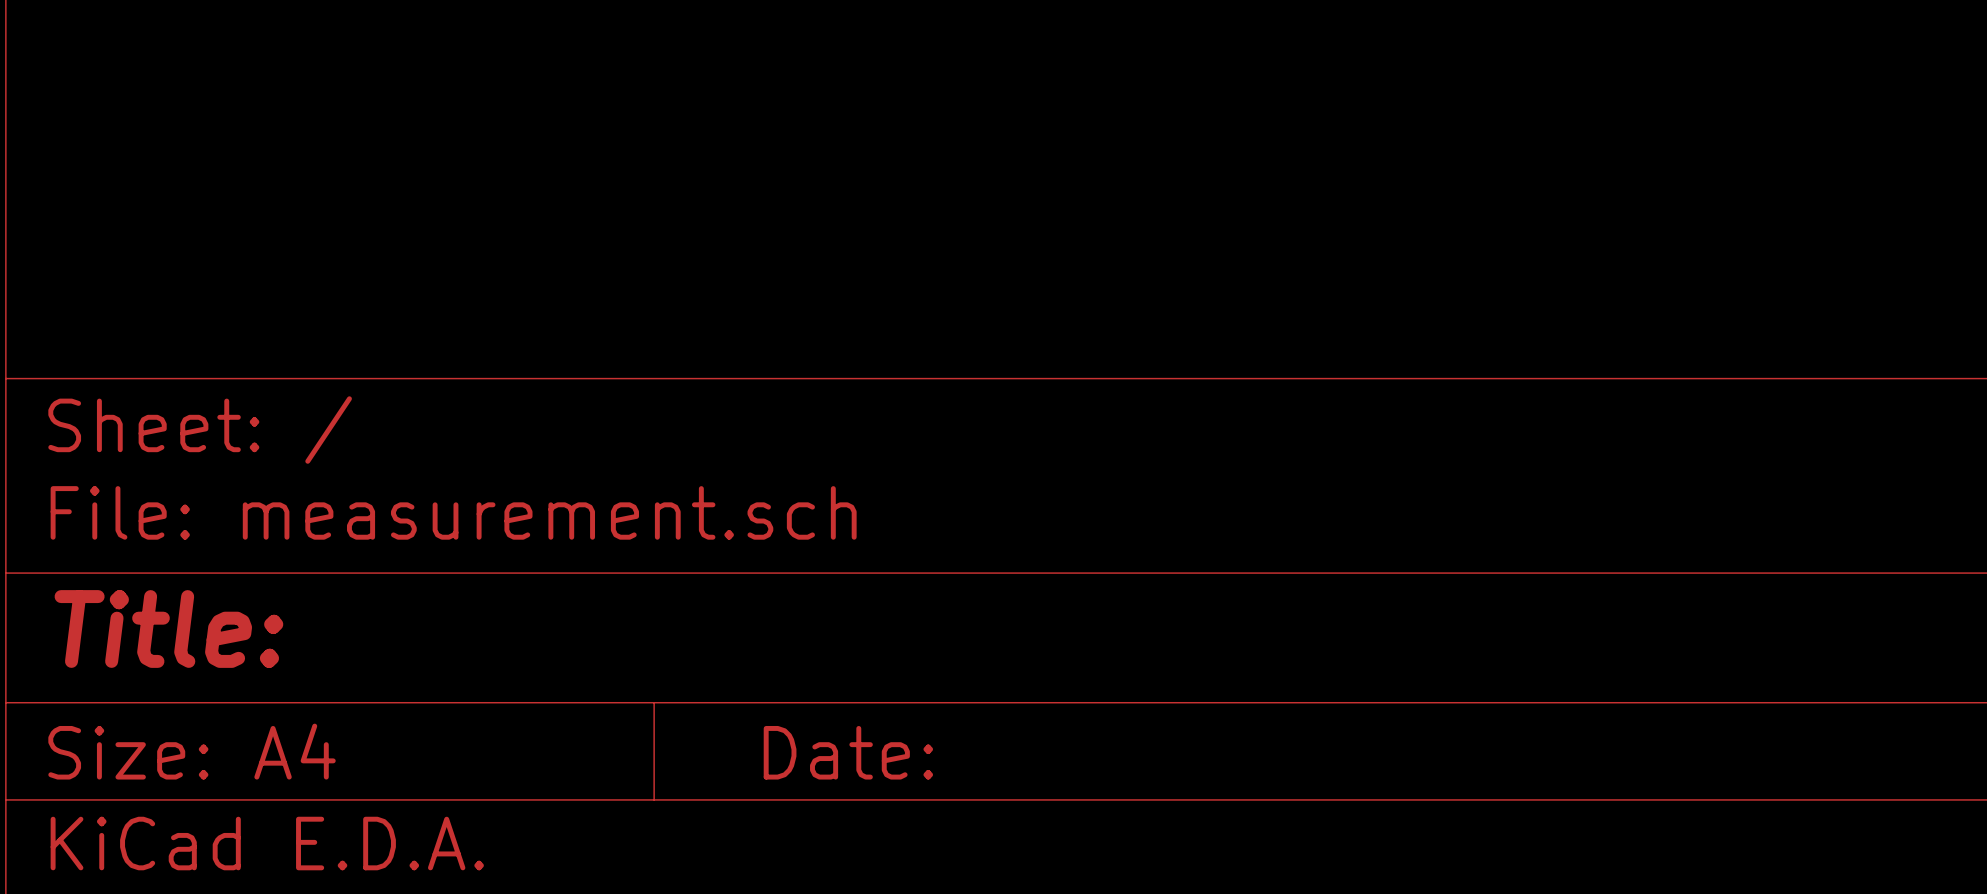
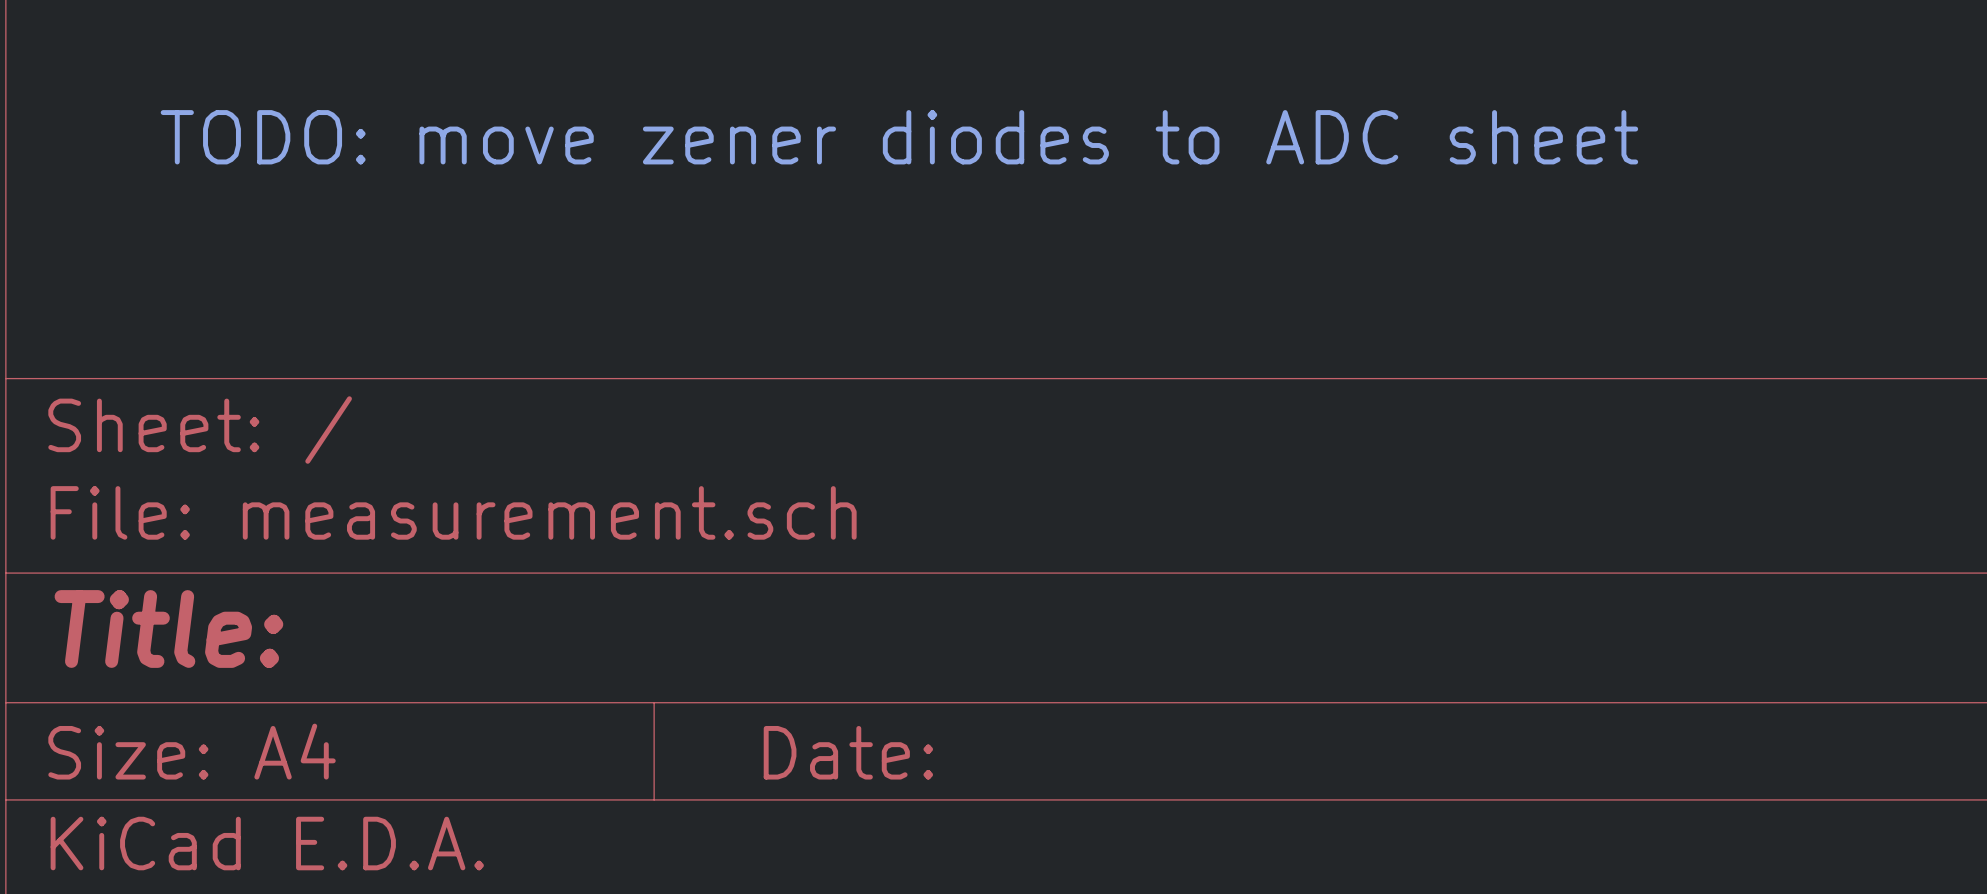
text: none -> TODO: move zener diodes to ADC sheet (899, 137)

